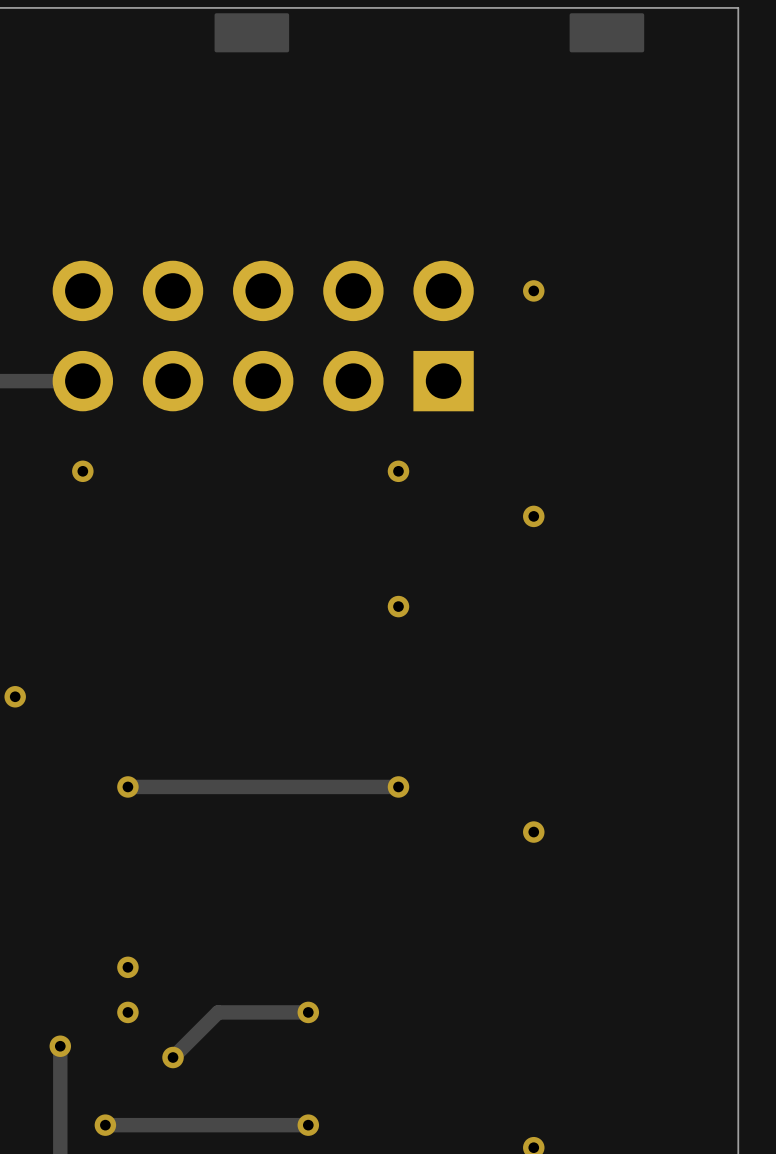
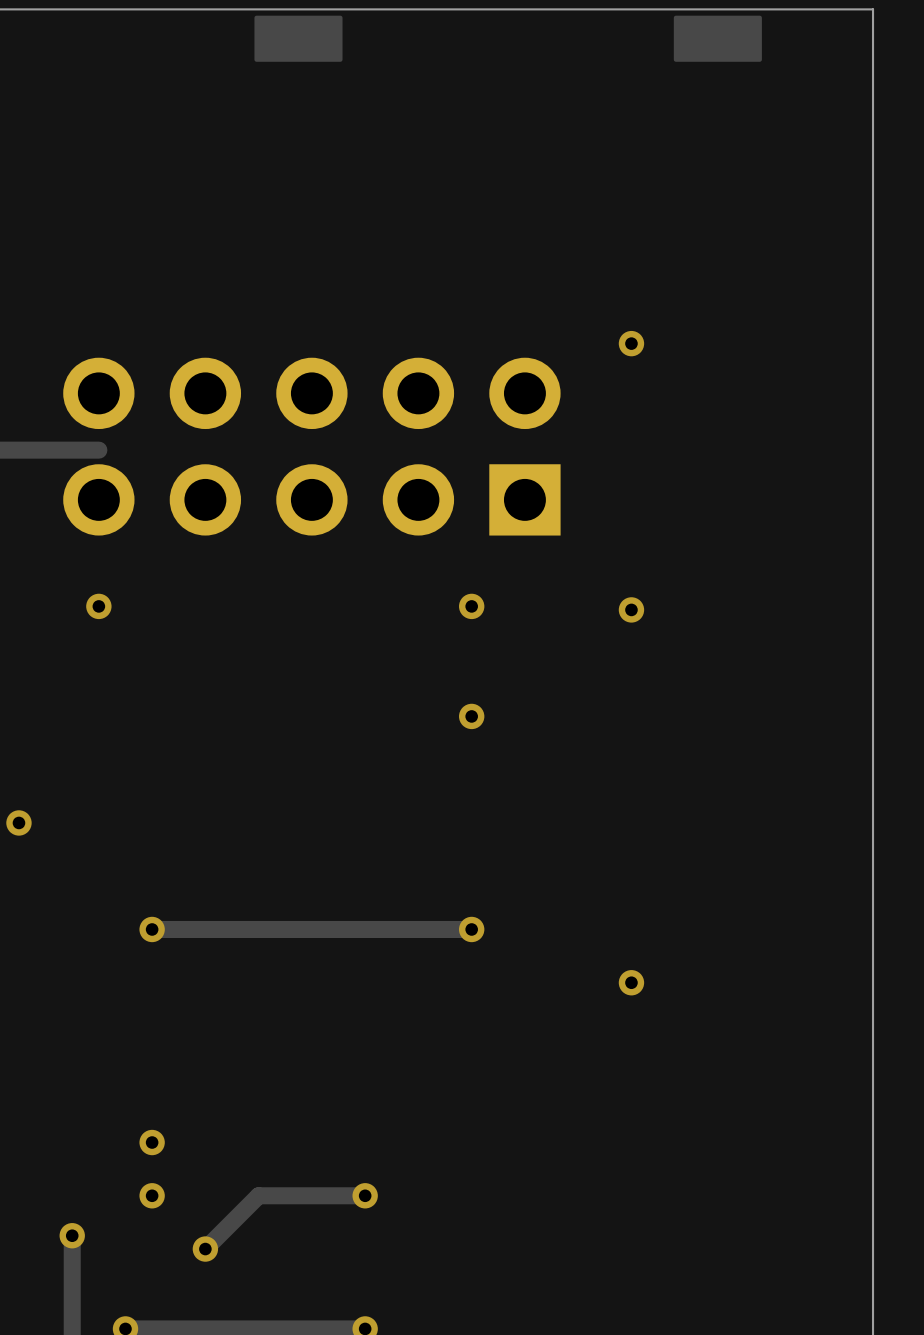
part position: (263, 336) -> (311, 446)
via position: (82, 471) -> (98, 606)
via position: (398, 471) -> (471, 606)

